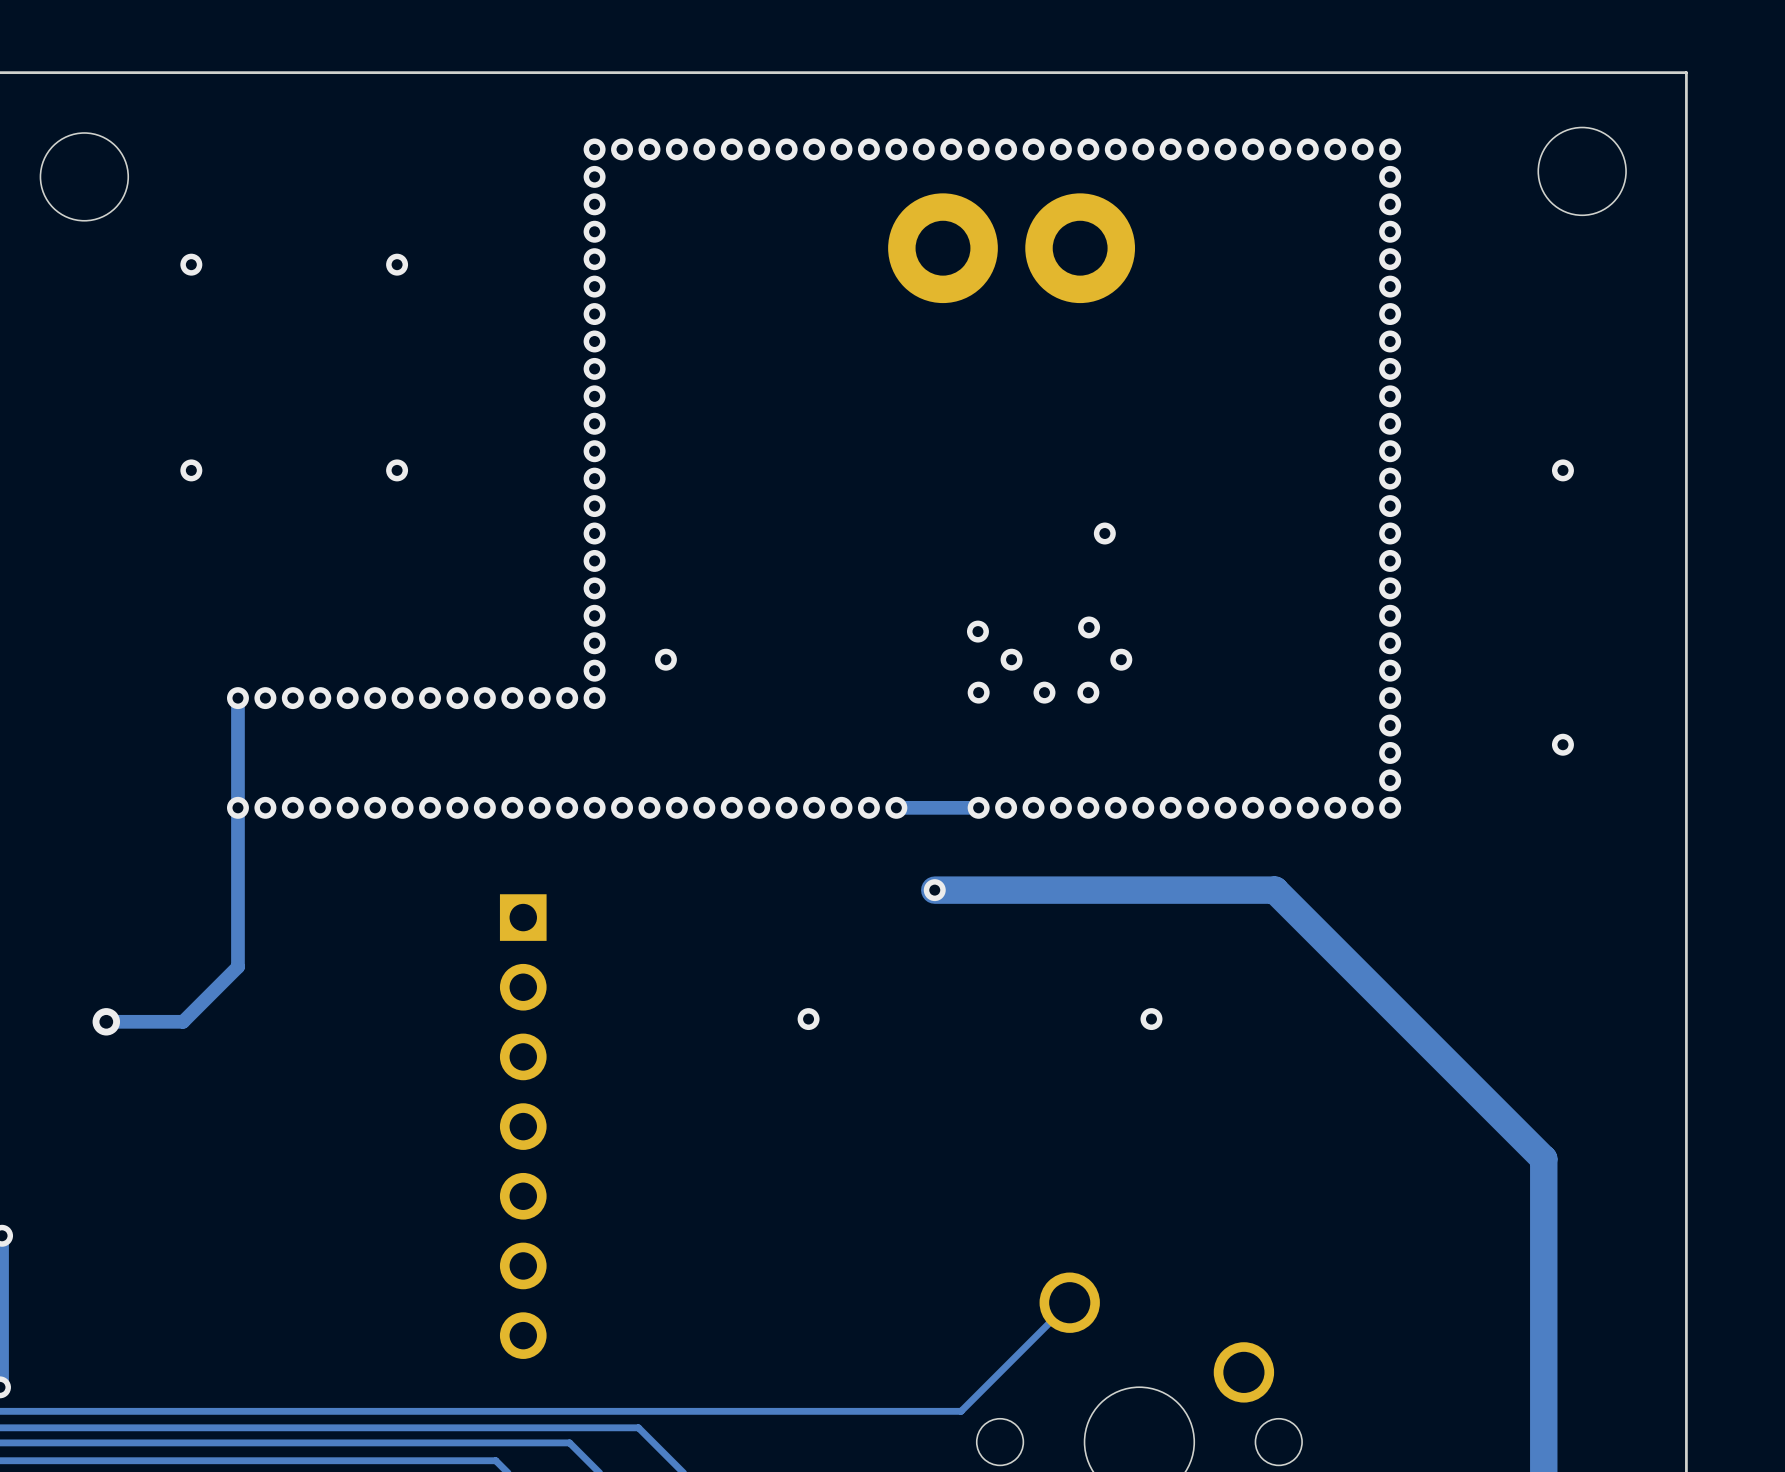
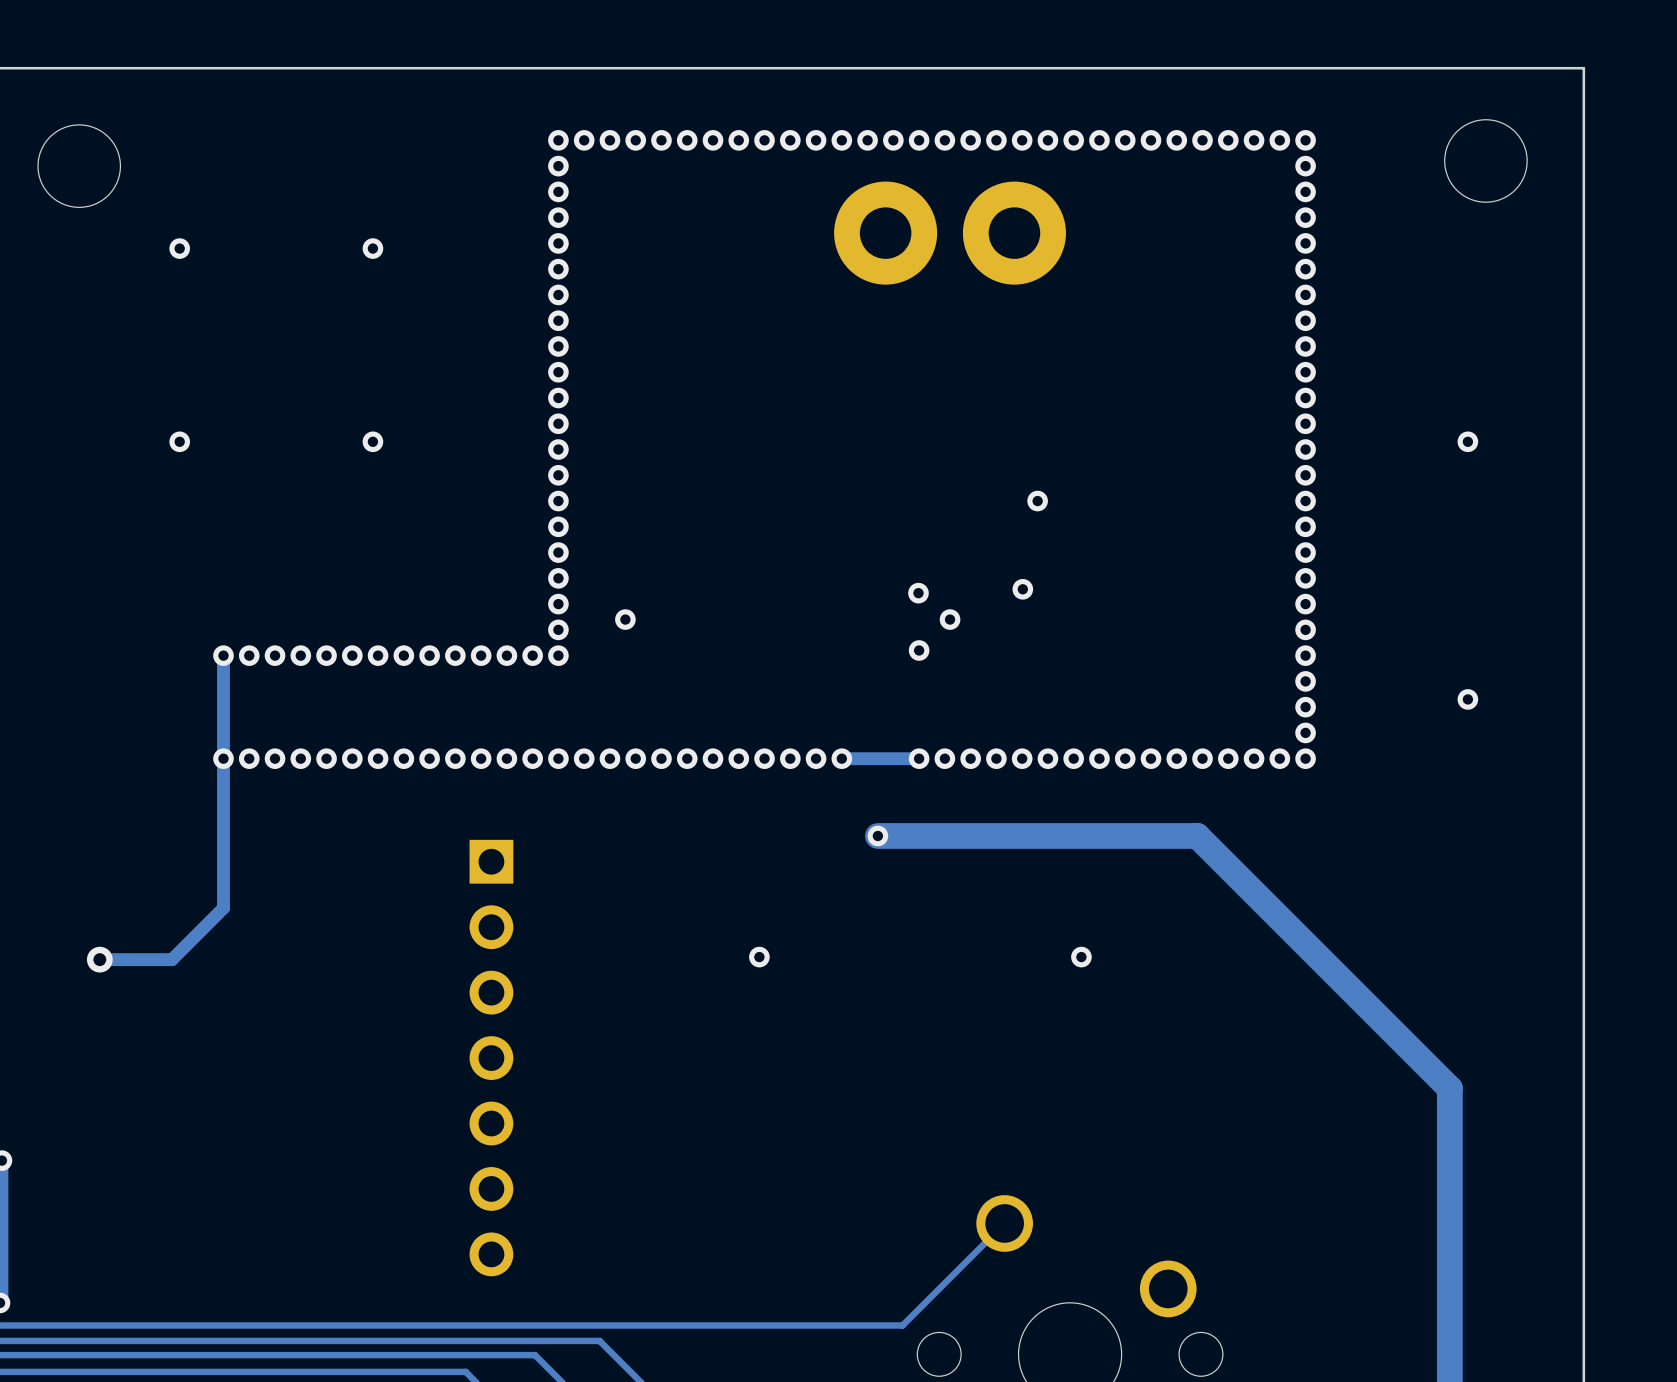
via: (1121, 659) -> none
via: (1044, 692) -> none
via: (1088, 692) -> none

